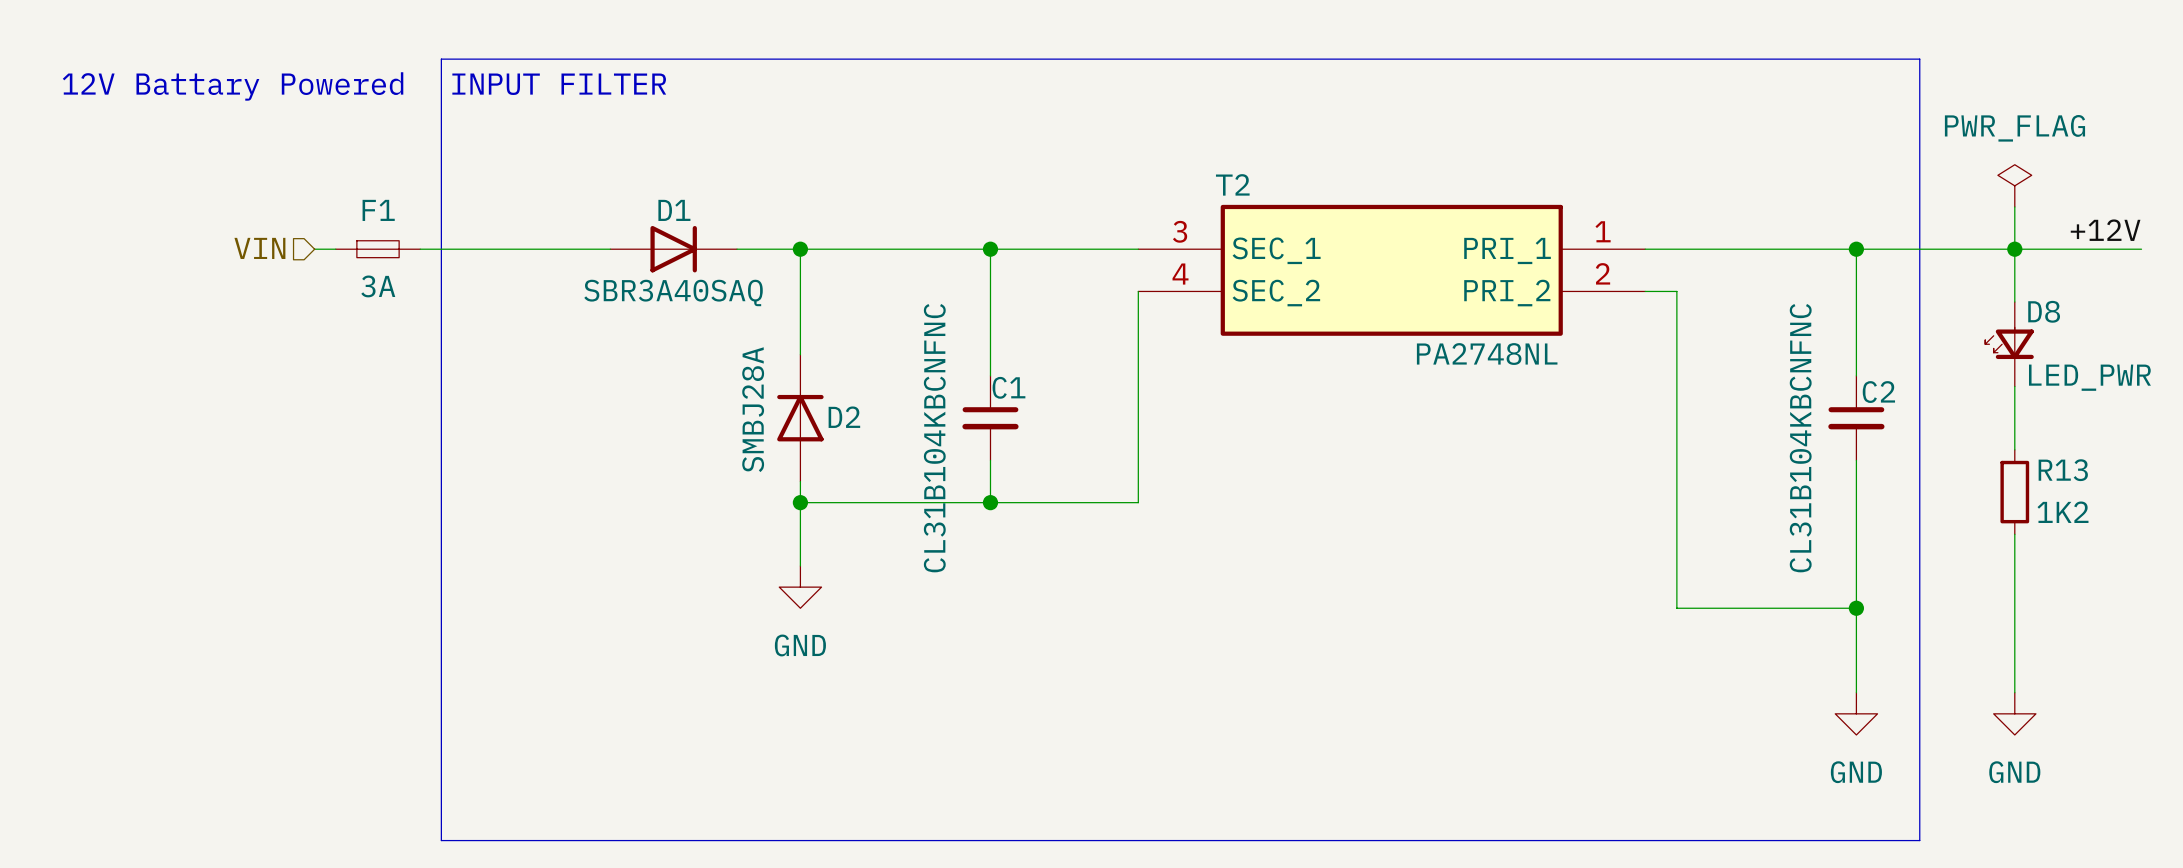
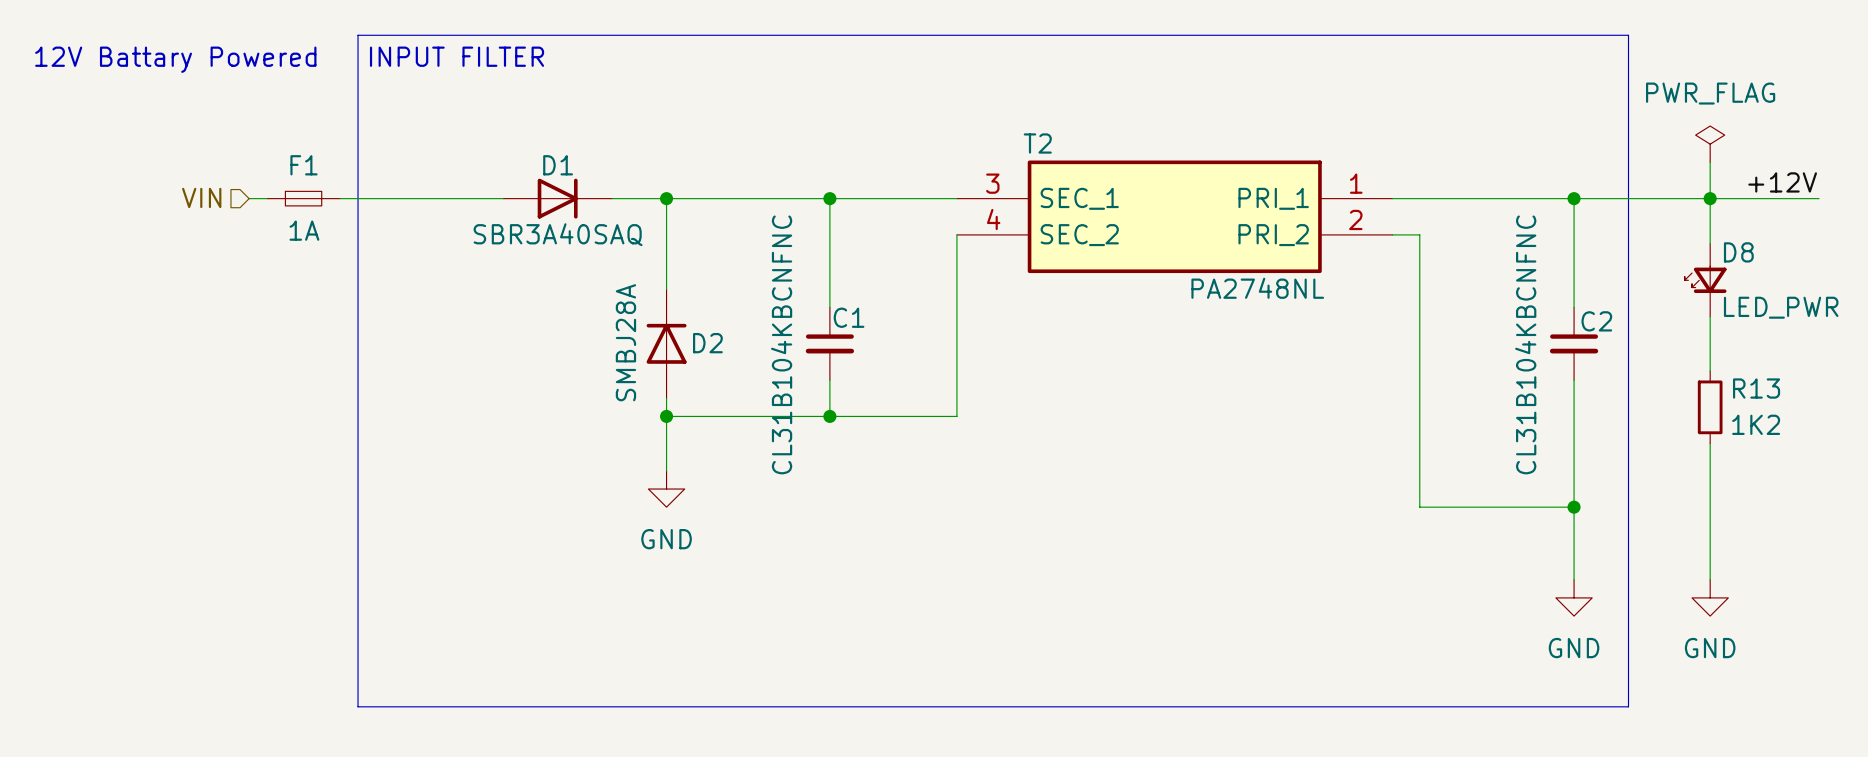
F1 value: 3A (378, 286) -> 1A (304, 230)

